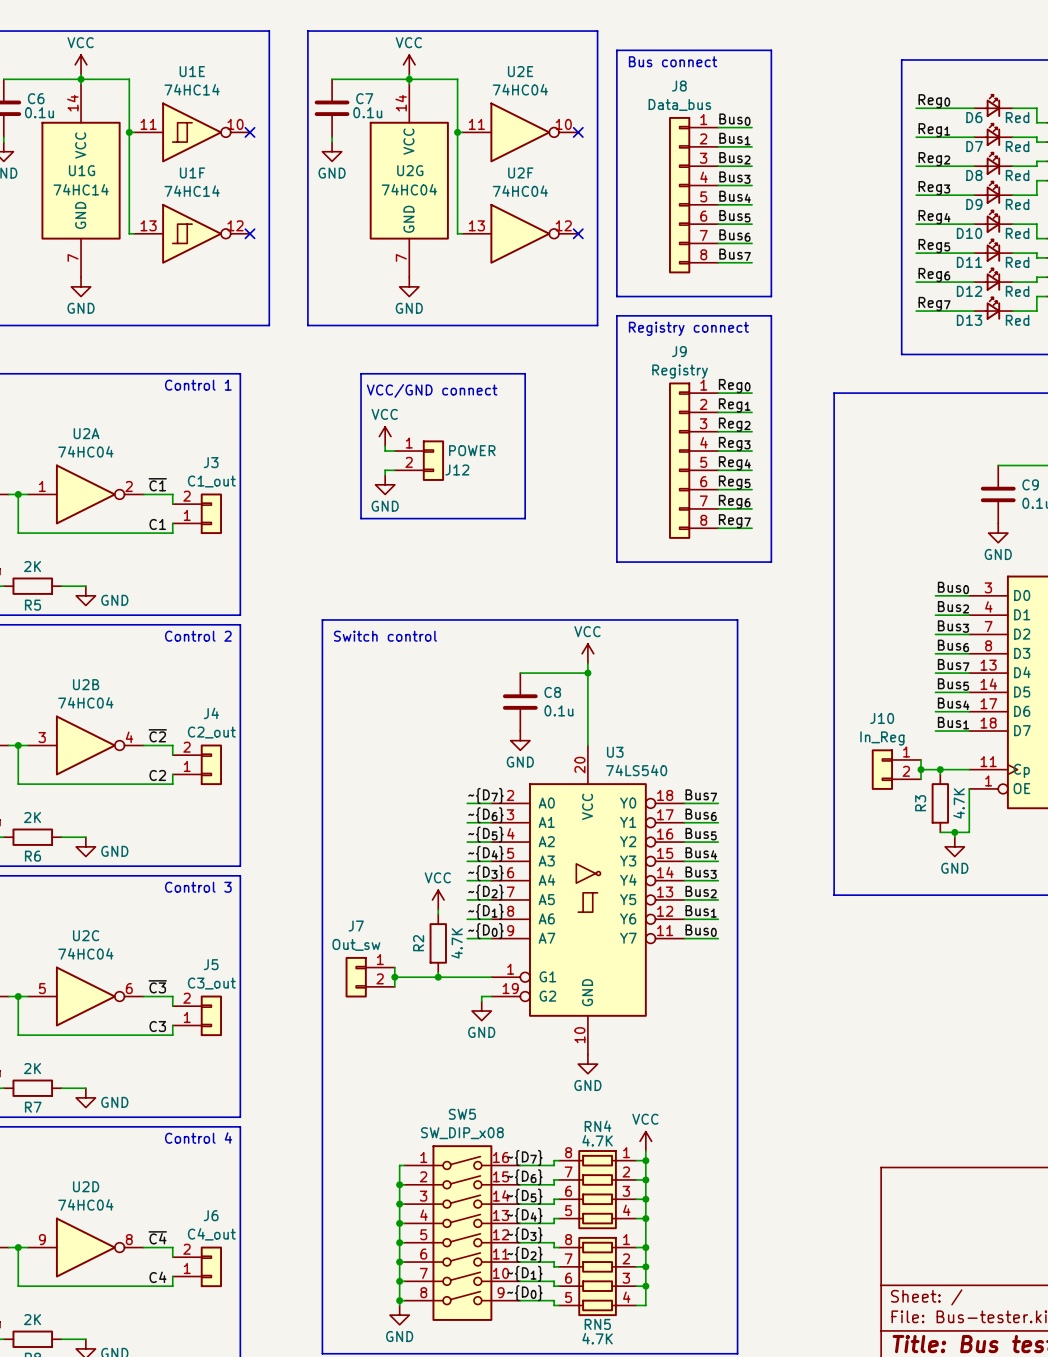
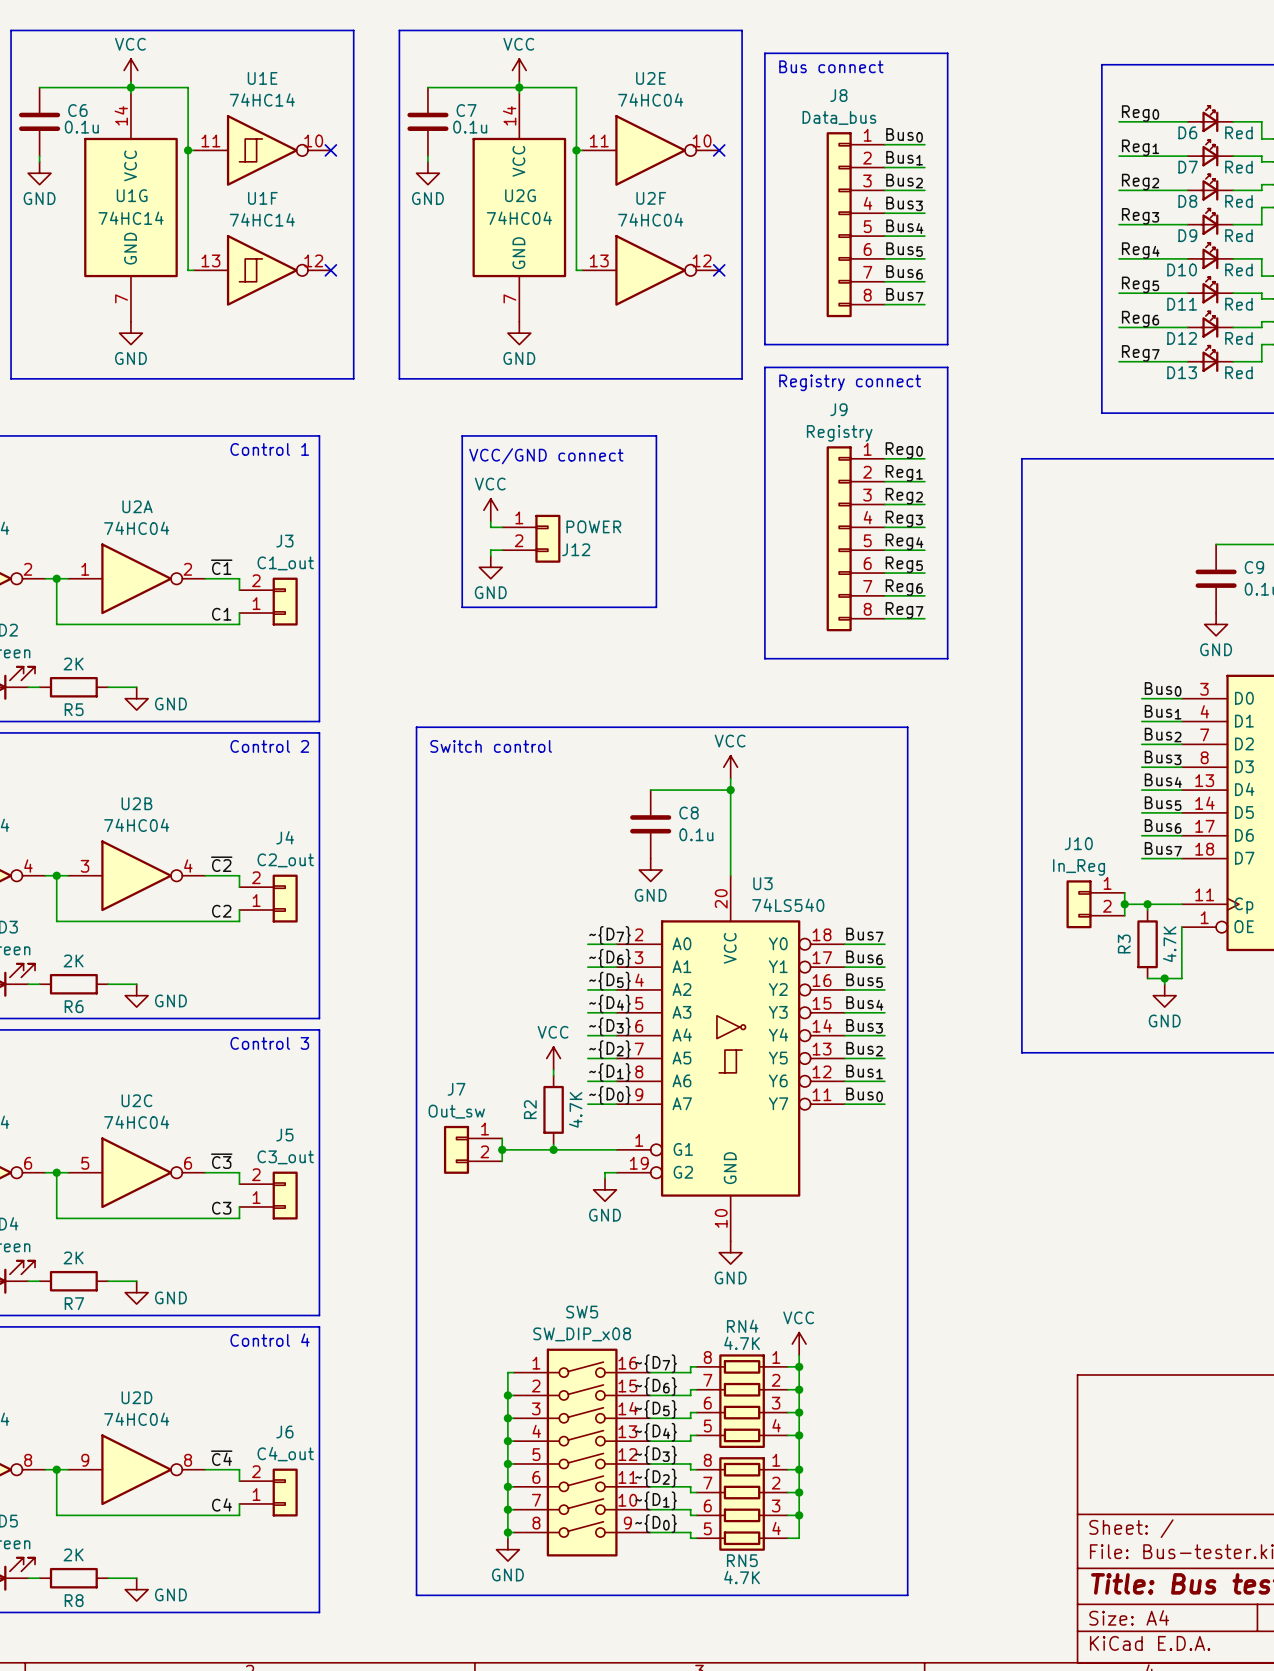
label: Bus2 (953, 607) -> Bus1 (1163, 712)
label: Bus3 (953, 626) -> Bus2 (1163, 735)
label: Bus6 (953, 645) -> Bus3 (1163, 757)
label: Bus7 (953, 665) -> Bus4 (1163, 780)
label: Bus4 (953, 703) -> Bus6 (1163, 826)
label: Bus1 (953, 723) -> Bus7 (1163, 849)

